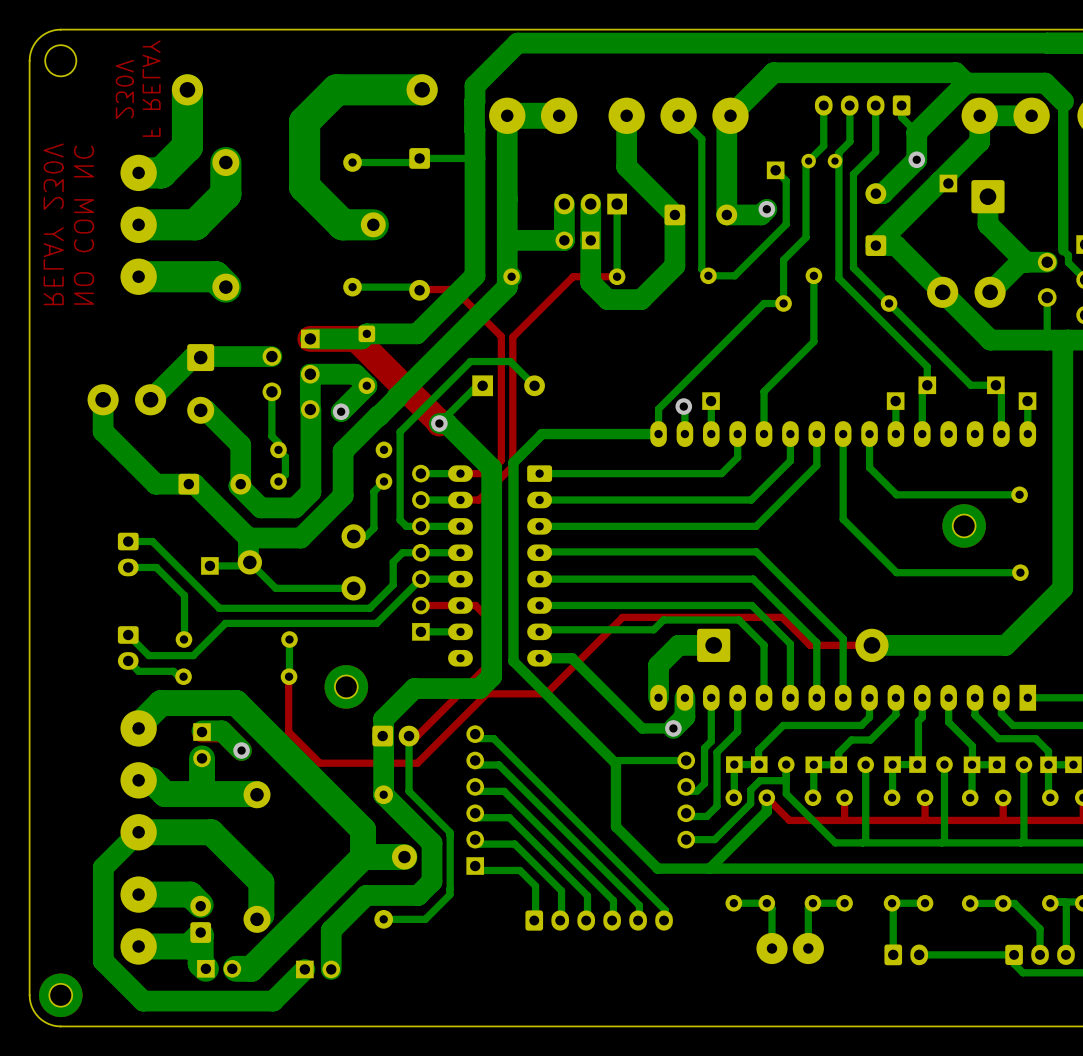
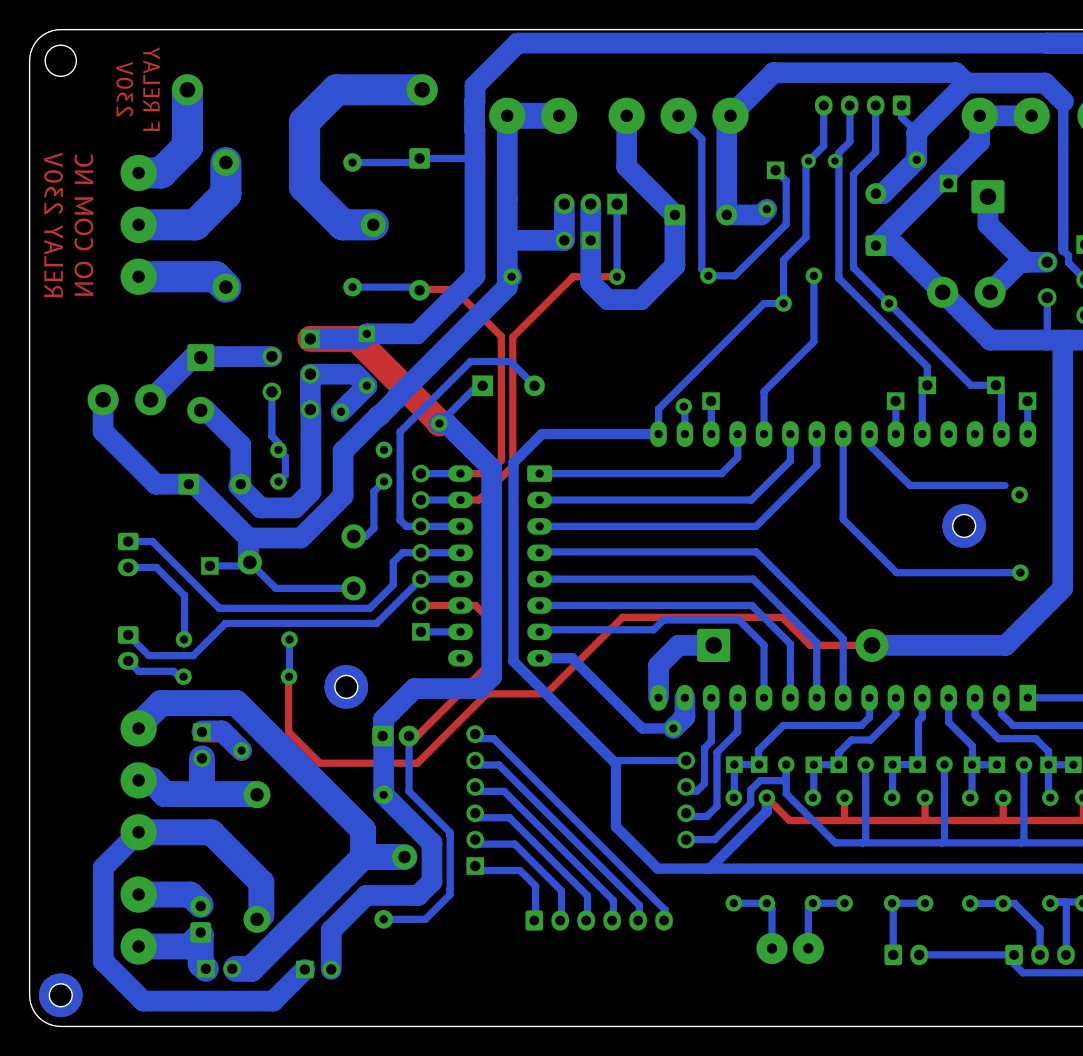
bottom track: (869, 444) (869, 467) (896, 494) (1019, 494) -> (869, 444) (910, 485) (1005, 485)

